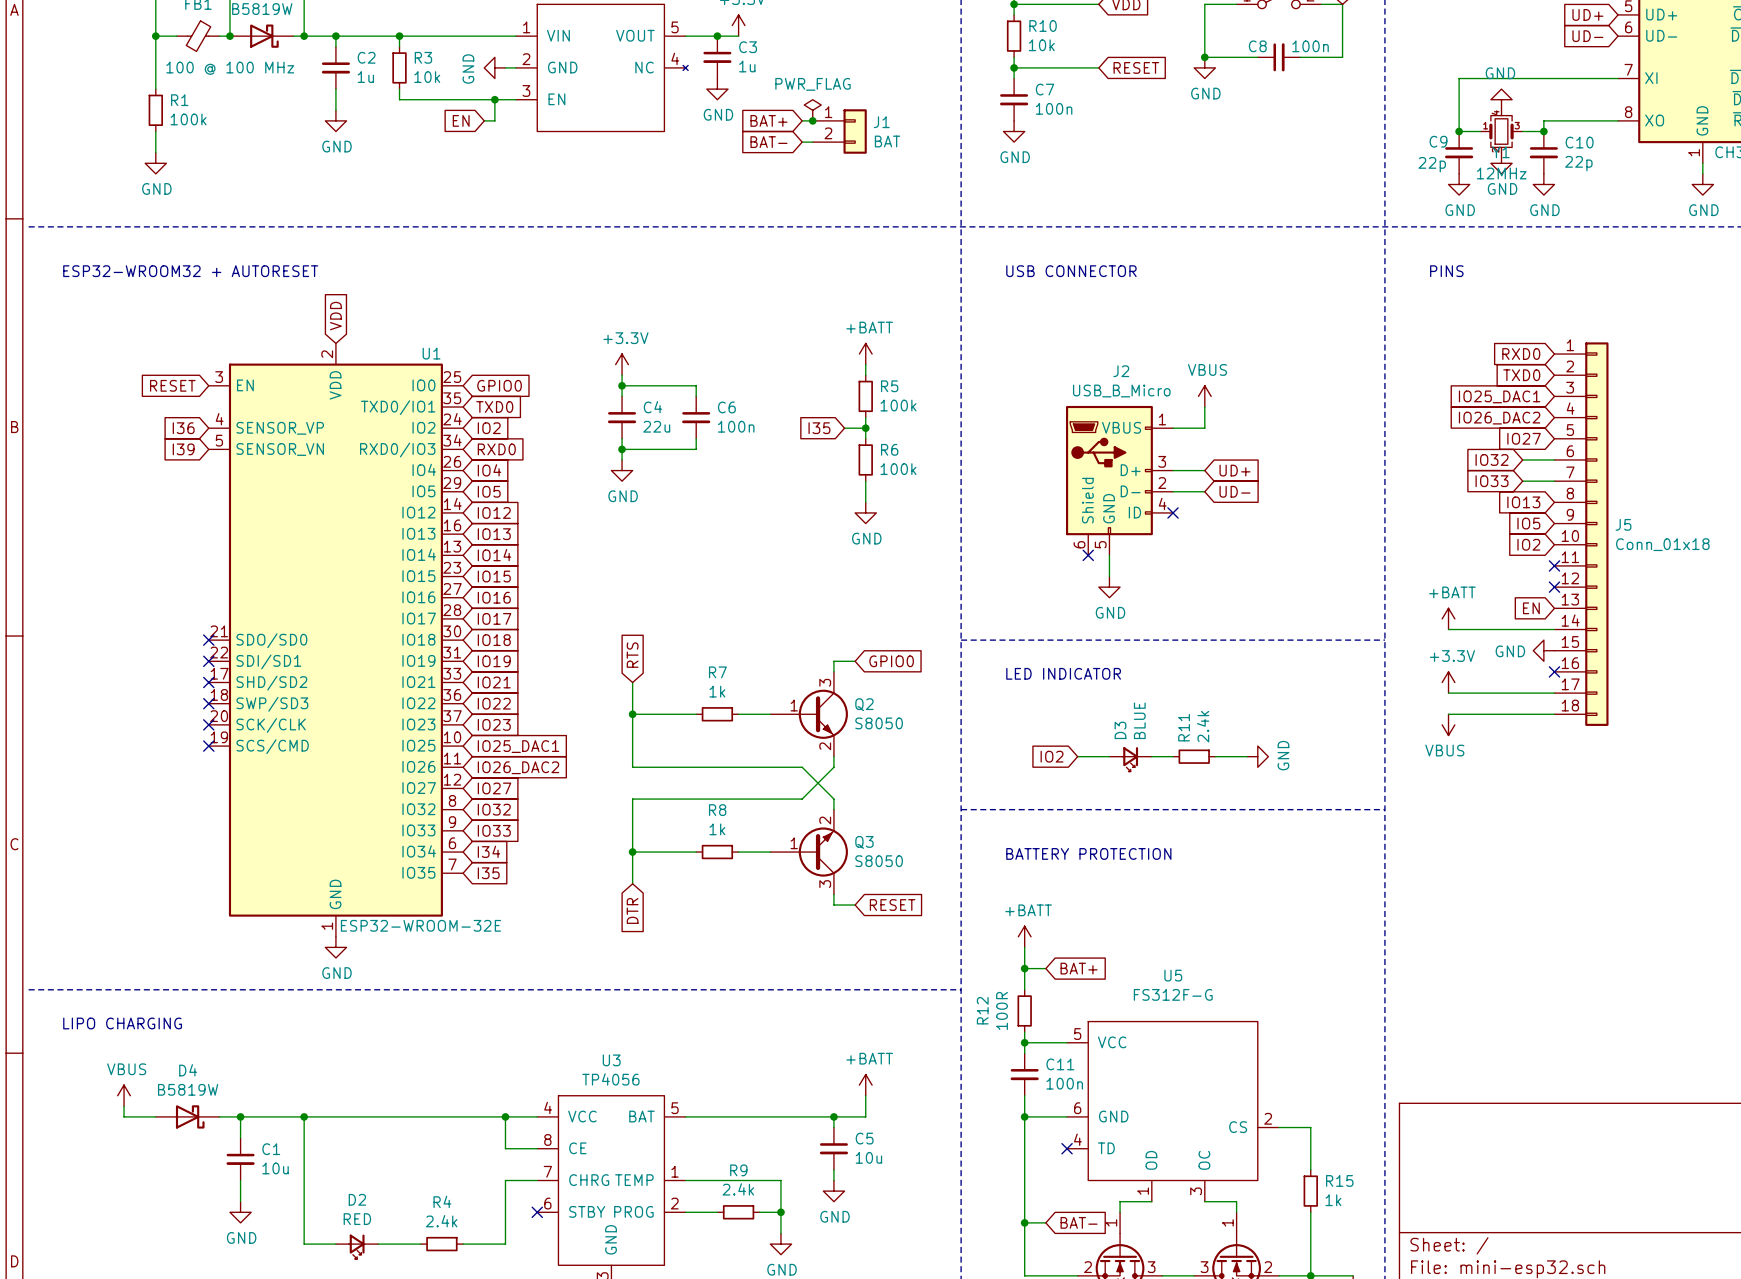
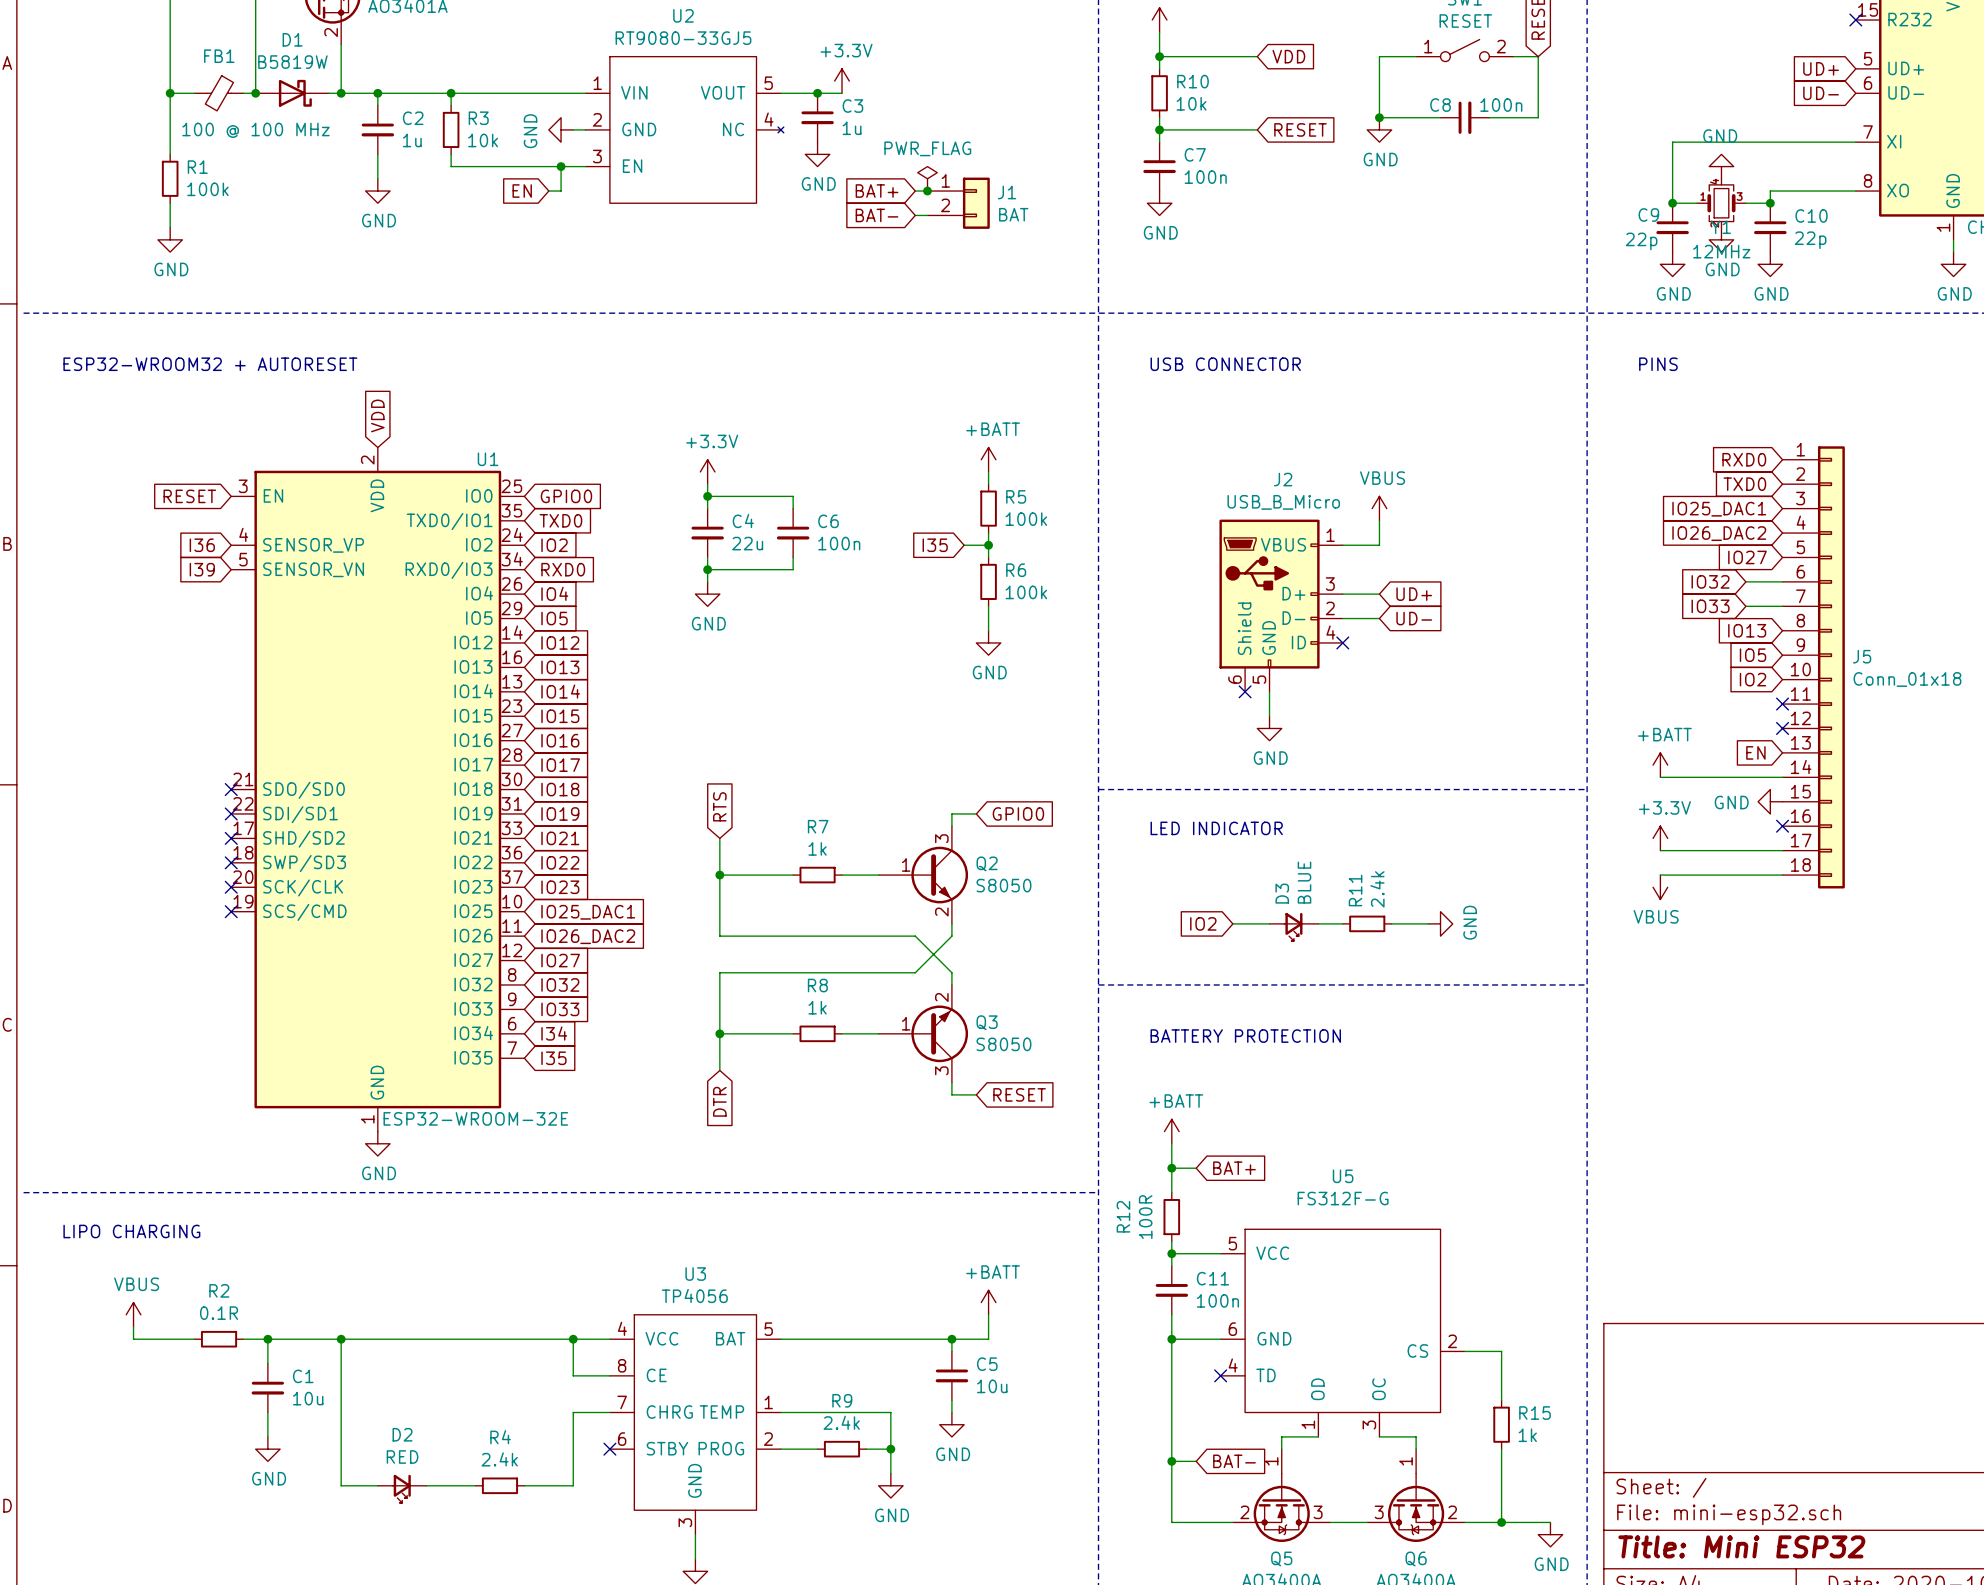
D4: B5819W (187, 1116) -> none
R2: none -> 0.1R (219, 1339)

